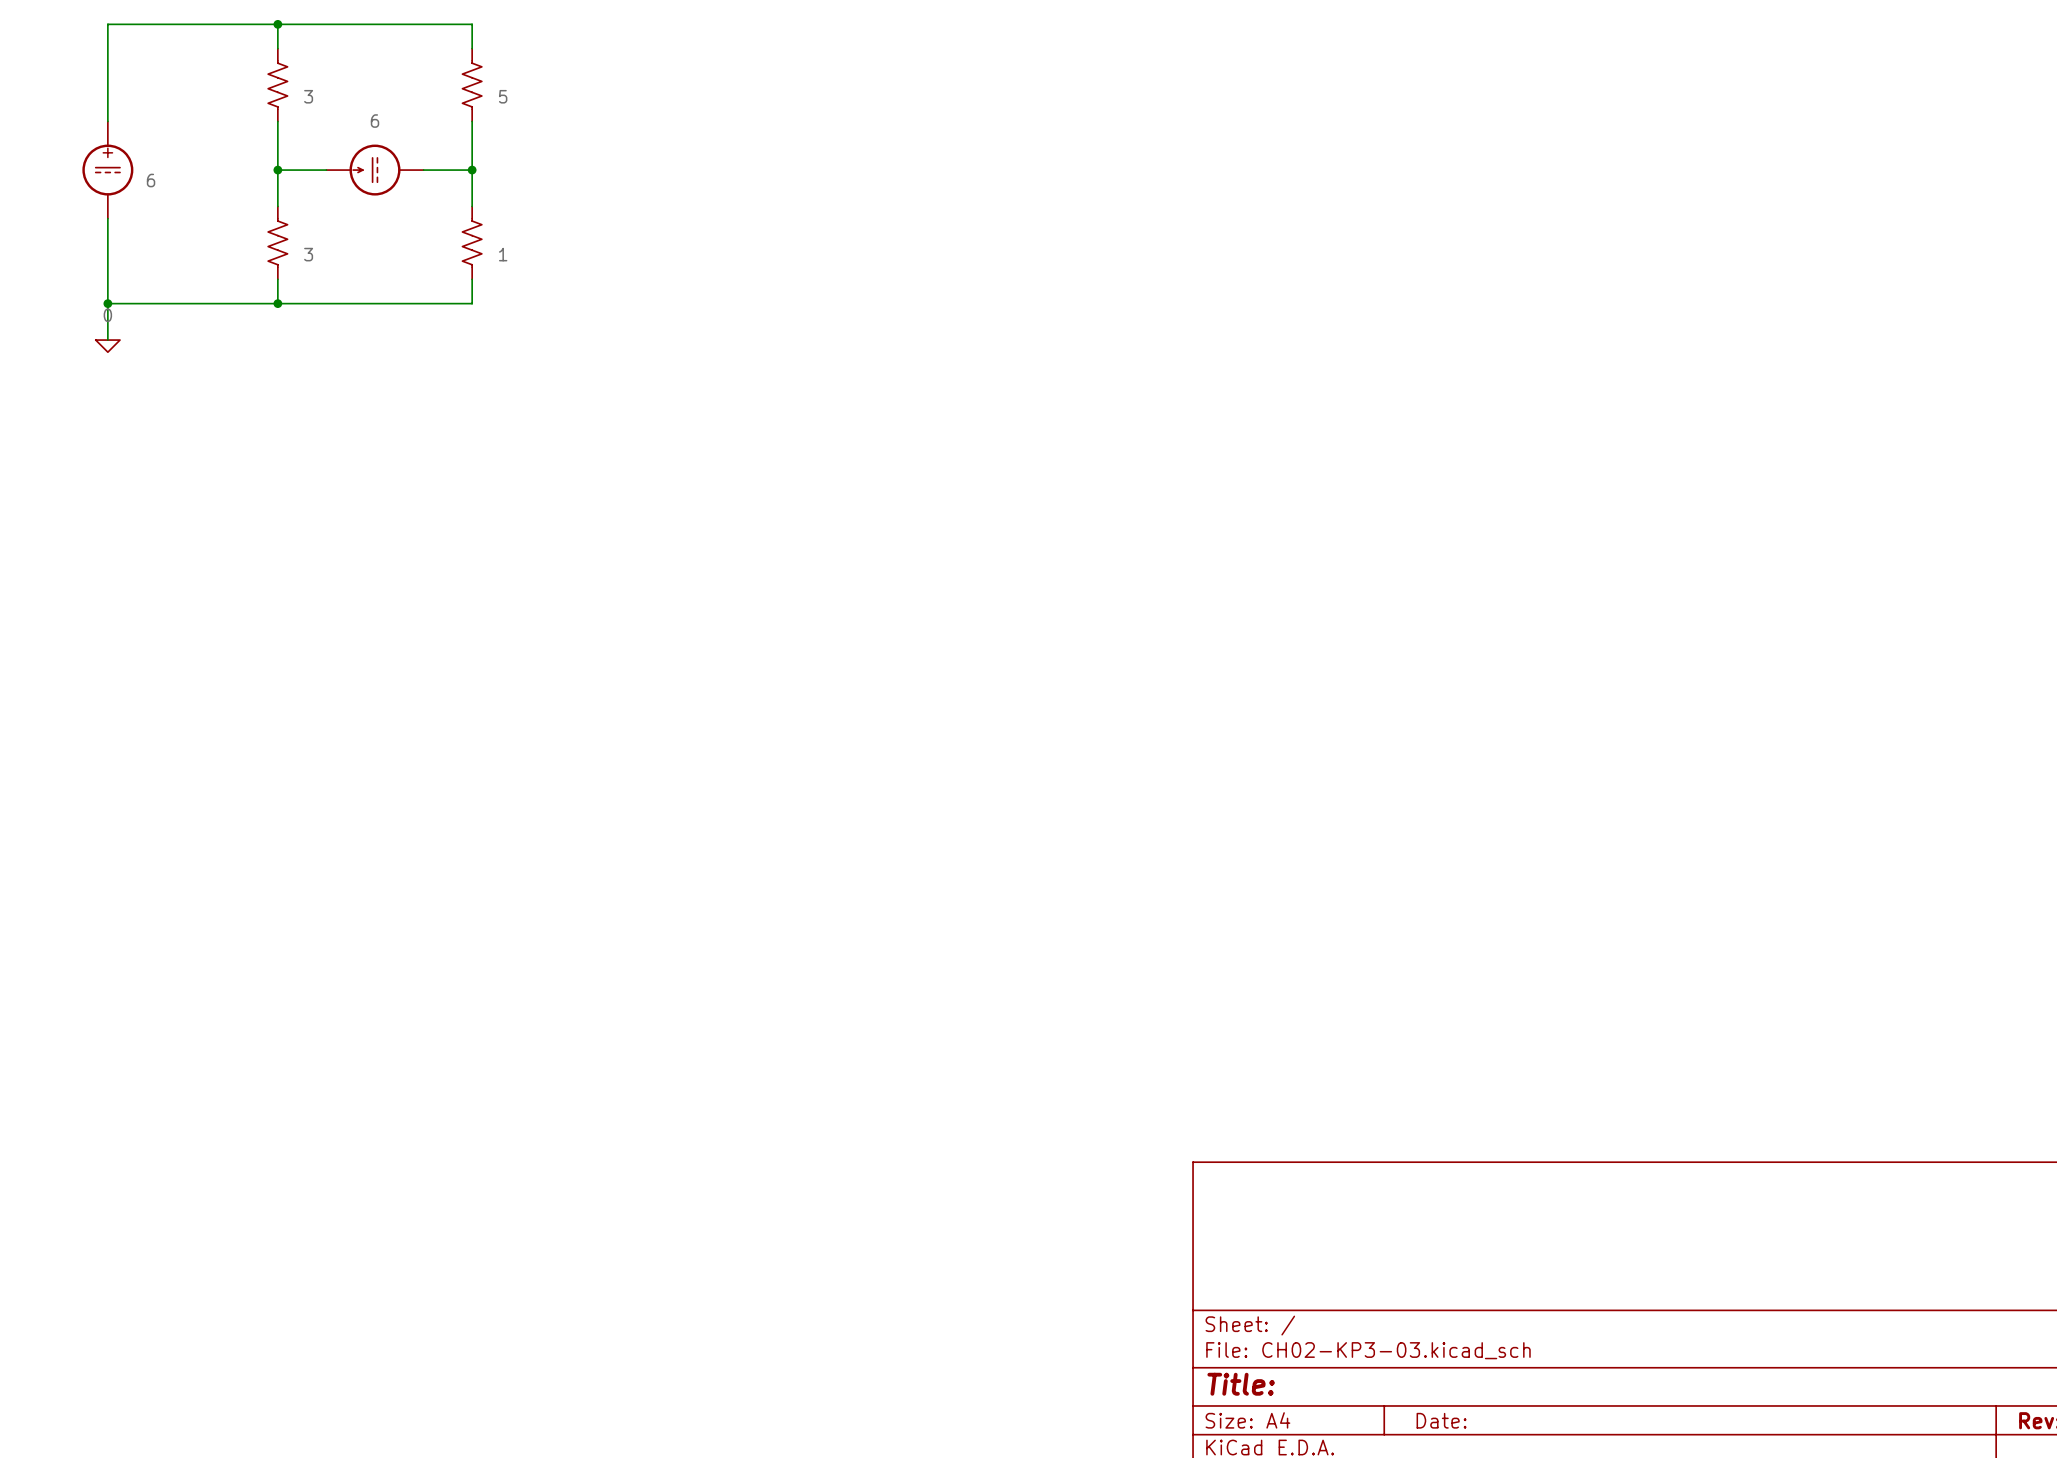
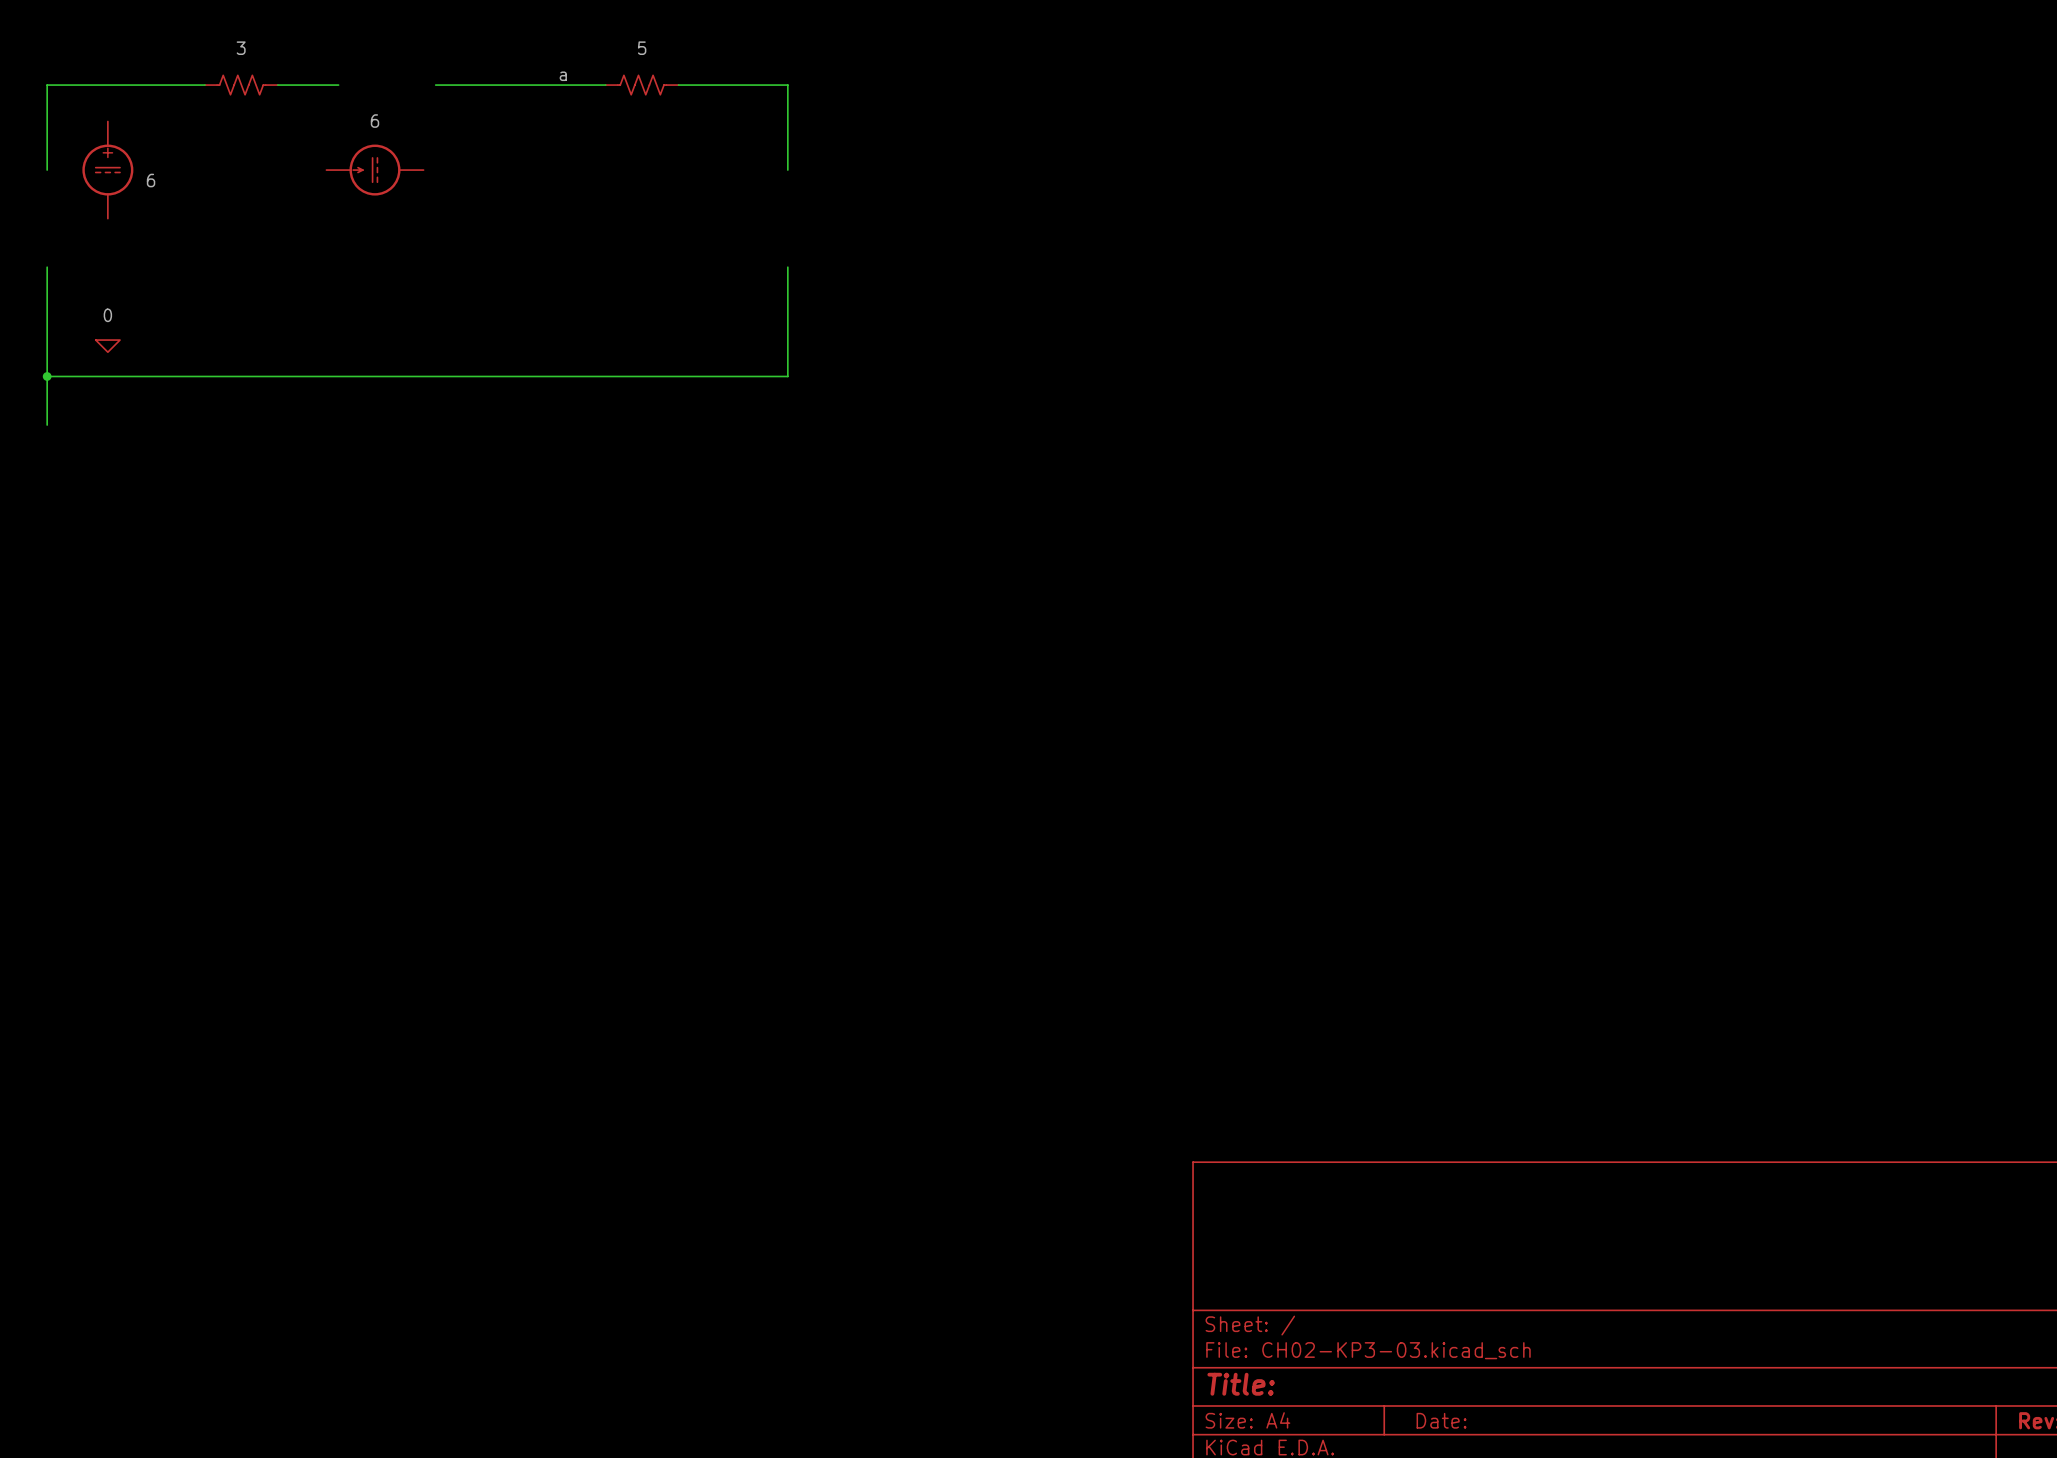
wire: (277, 24) (277, 48) -> none
junction: (277, 24) -> none
wire: (472, 48) (472, 24) (107, 24) (107, 121) -> none
label: none -> a (563, 76)
wire: none -> (205, 85) (47, 85) (47, 170)
wire: none -> (277, 85) (338, 85)
part rotation: 0° (277, 85) -> 90° clockwise (241, 85)
wire: none -> (435, 85) (605, 85)
part rotation: 0° (472, 85) -> 90° clockwise (642, 85)
part position: (472, 85) -> (642, 85)
wire: none -> (678, 85) (787, 85) (787, 170)
part value position: 3 (308, 96) -> 3 (241, 48)
part value position: 5 (503, 96) -> 5 (642, 48)
wire: (277, 121) (277, 206) -> none
wire: (472, 121) (472, 206) -> none
wire: (277, 170) (326, 170) -> none
junction: (277, 170) -> none
wire: (423, 170) (472, 170) -> none
junction: (472, 170) -> none
wire: (107, 218) (107, 340) -> none
part: 3 (277, 242) -> none
part: 1 (472, 242) -> none
wire: none -> (47, 267) (47, 425)
wire: none -> (787, 267) (787, 376) (47, 376)
wire: (277, 279) (277, 303) -> none
wire: (472, 279) (472, 303) (107, 303) -> none
junction: (107, 303) -> none
junction: (277, 303) -> none
junction: none -> (47, 376)

